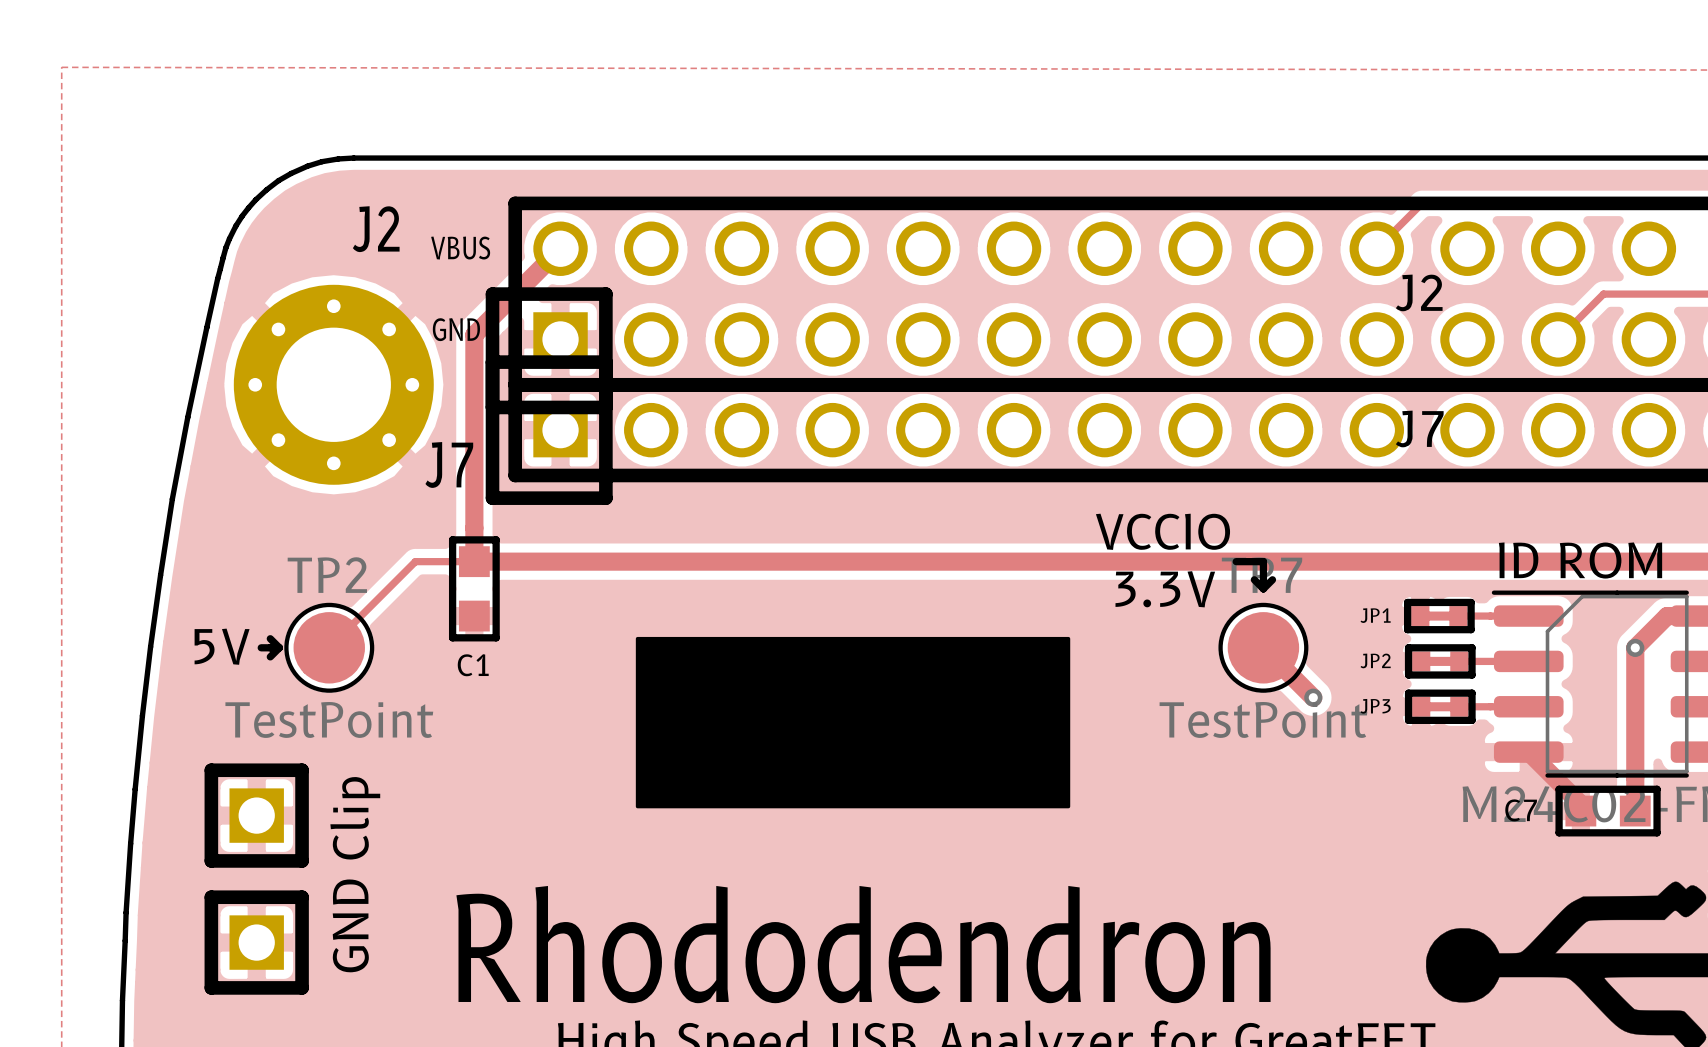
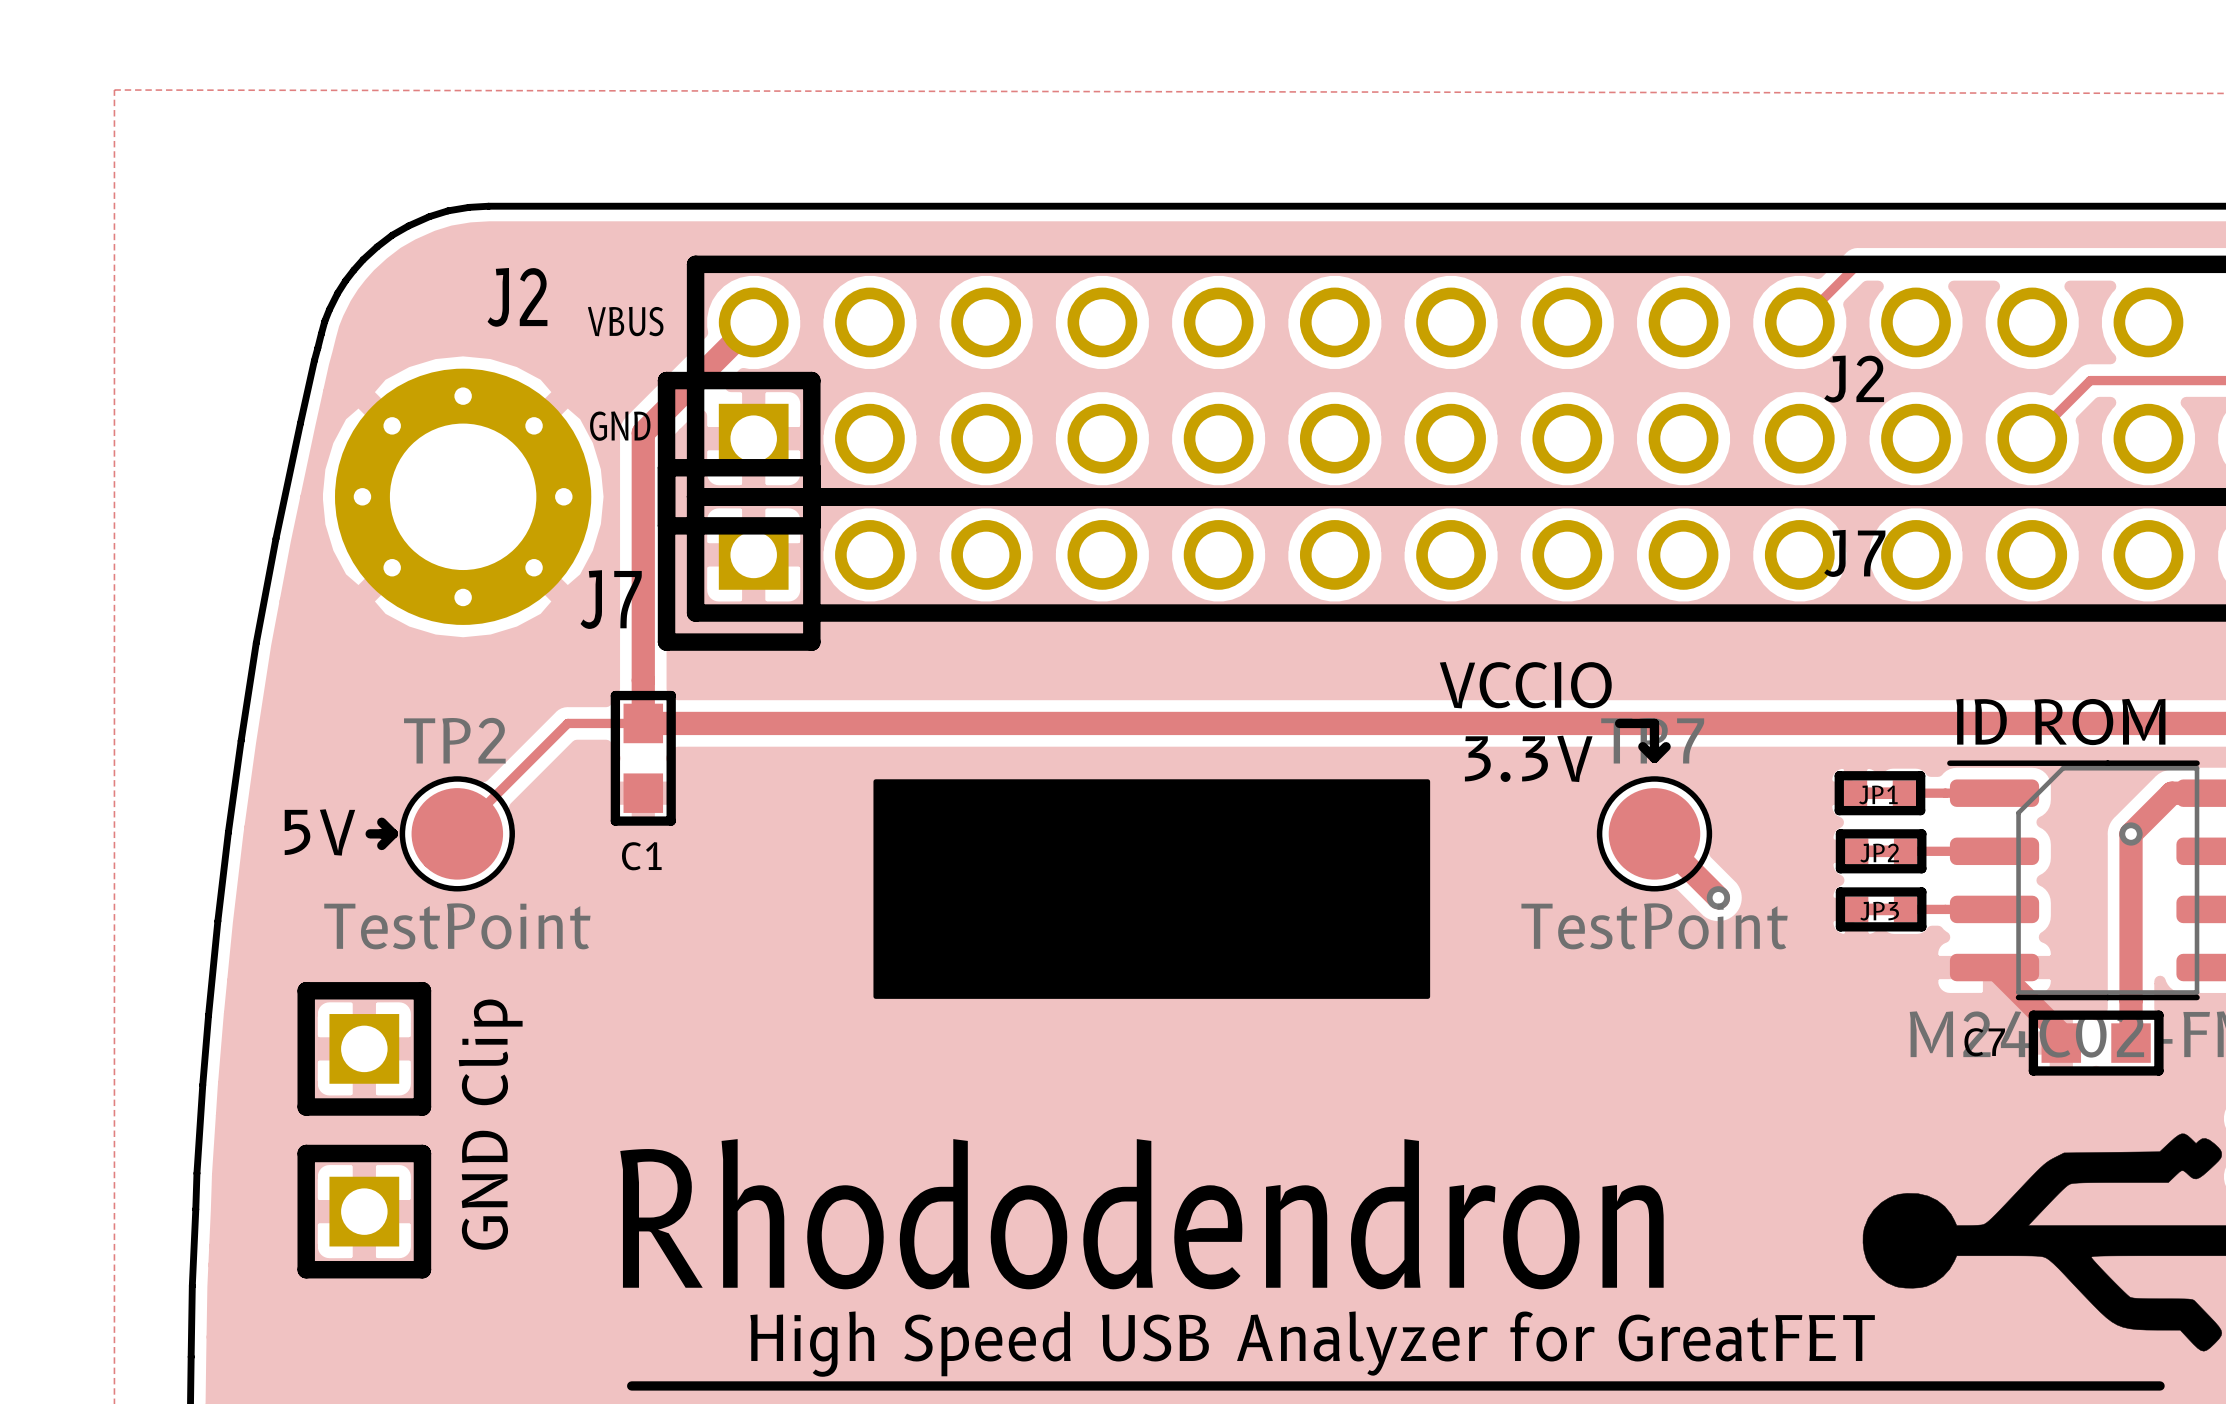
JP1 name position: JP1 (1375, 615) -> JP1 (1878, 794)
JP2 name position: JP2 (1375, 660) -> JP2 (1879, 853)
JP3 name position: JP3 (1375, 706) -> JP3 (1879, 911)
drawing position: (853, 722) -> (1151, 889)

